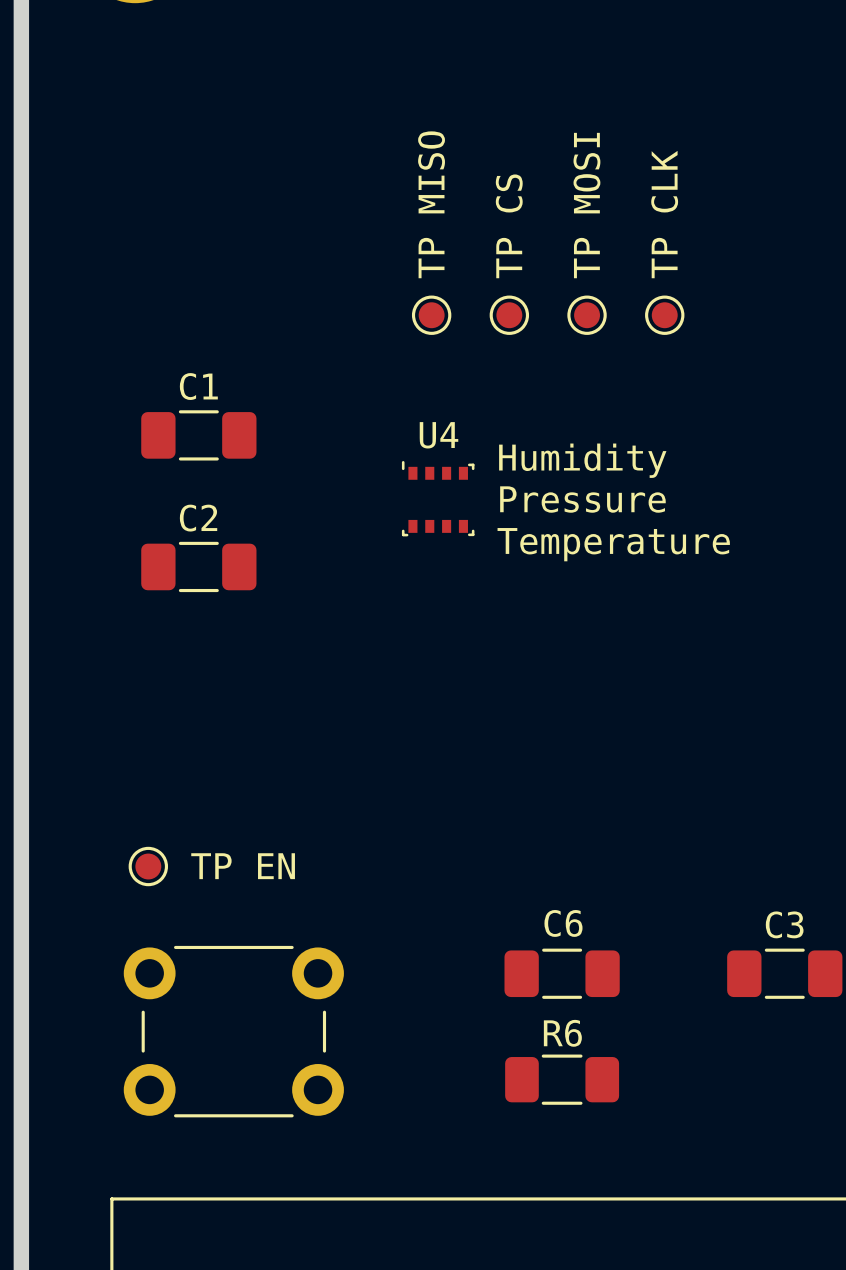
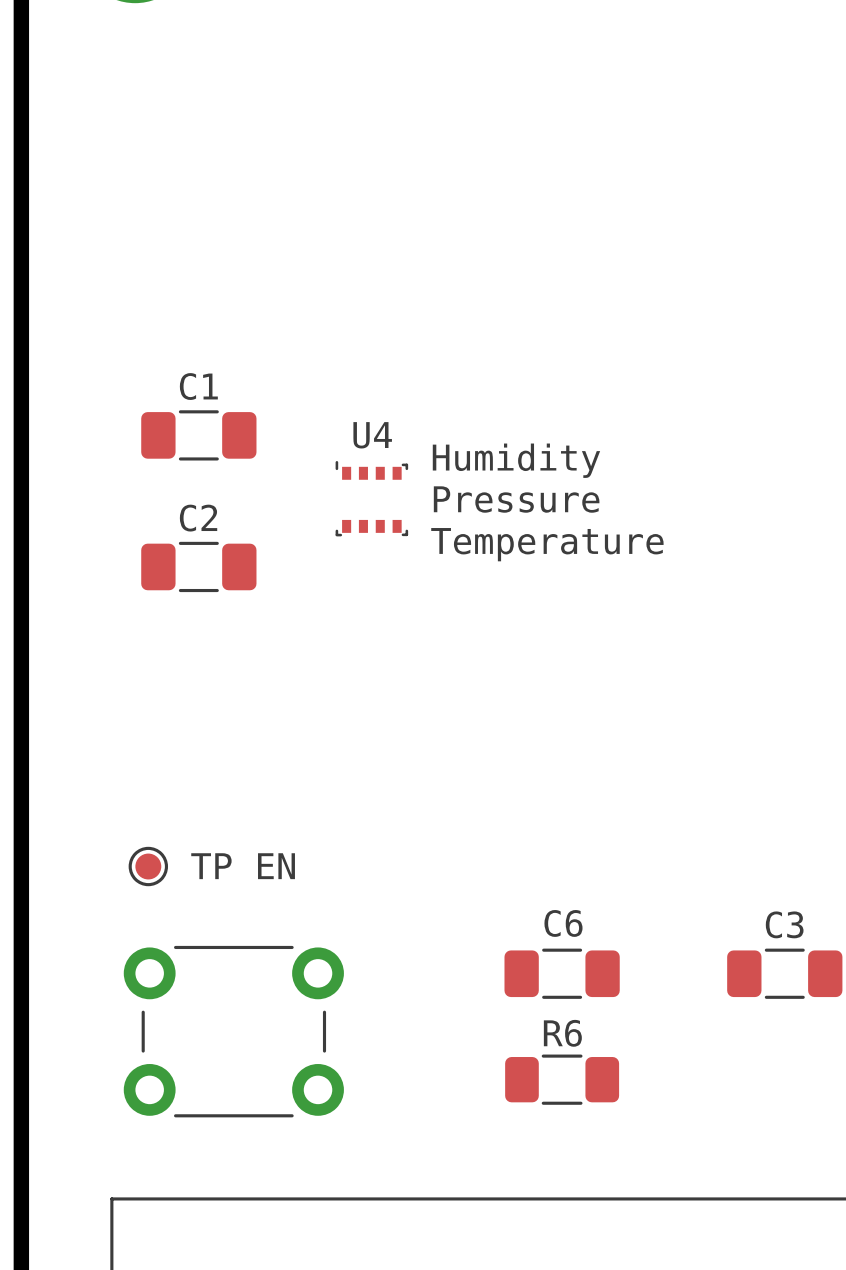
text: TP MISO (431, 204) -> none
text: TP MOSI (586, 205) -> none
text: TP CLK (664, 214) -> none
text: TP CS (509, 226) -> none
part: (431, 315) -> none
part: (509, 315) -> none
part: (587, 315) -> none
part: (664, 315) -> none
text position: Humidity (582, 460) -> Humidity (516, 460)
U4 position: (438, 498) -> (371, 498)
text position: Pressure (582, 499) -> Pressure (516, 499)
text position: Temperature (613, 544) -> Temperature (547, 544)

